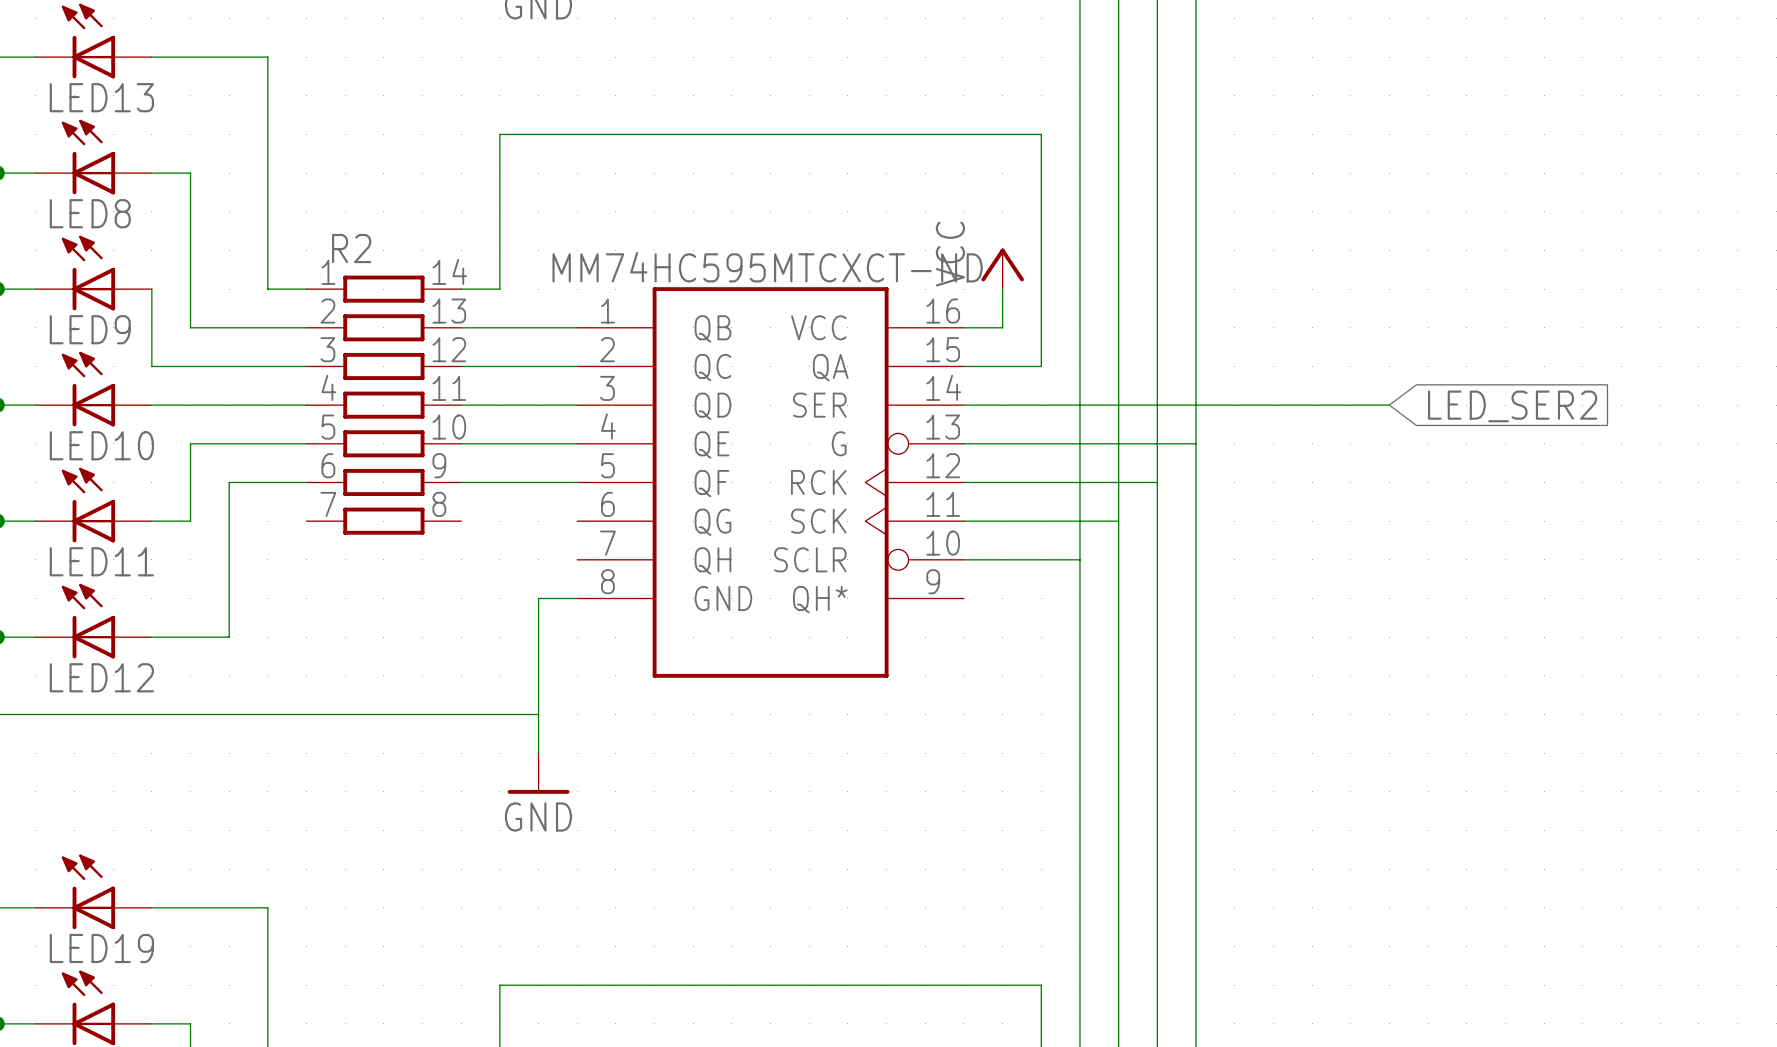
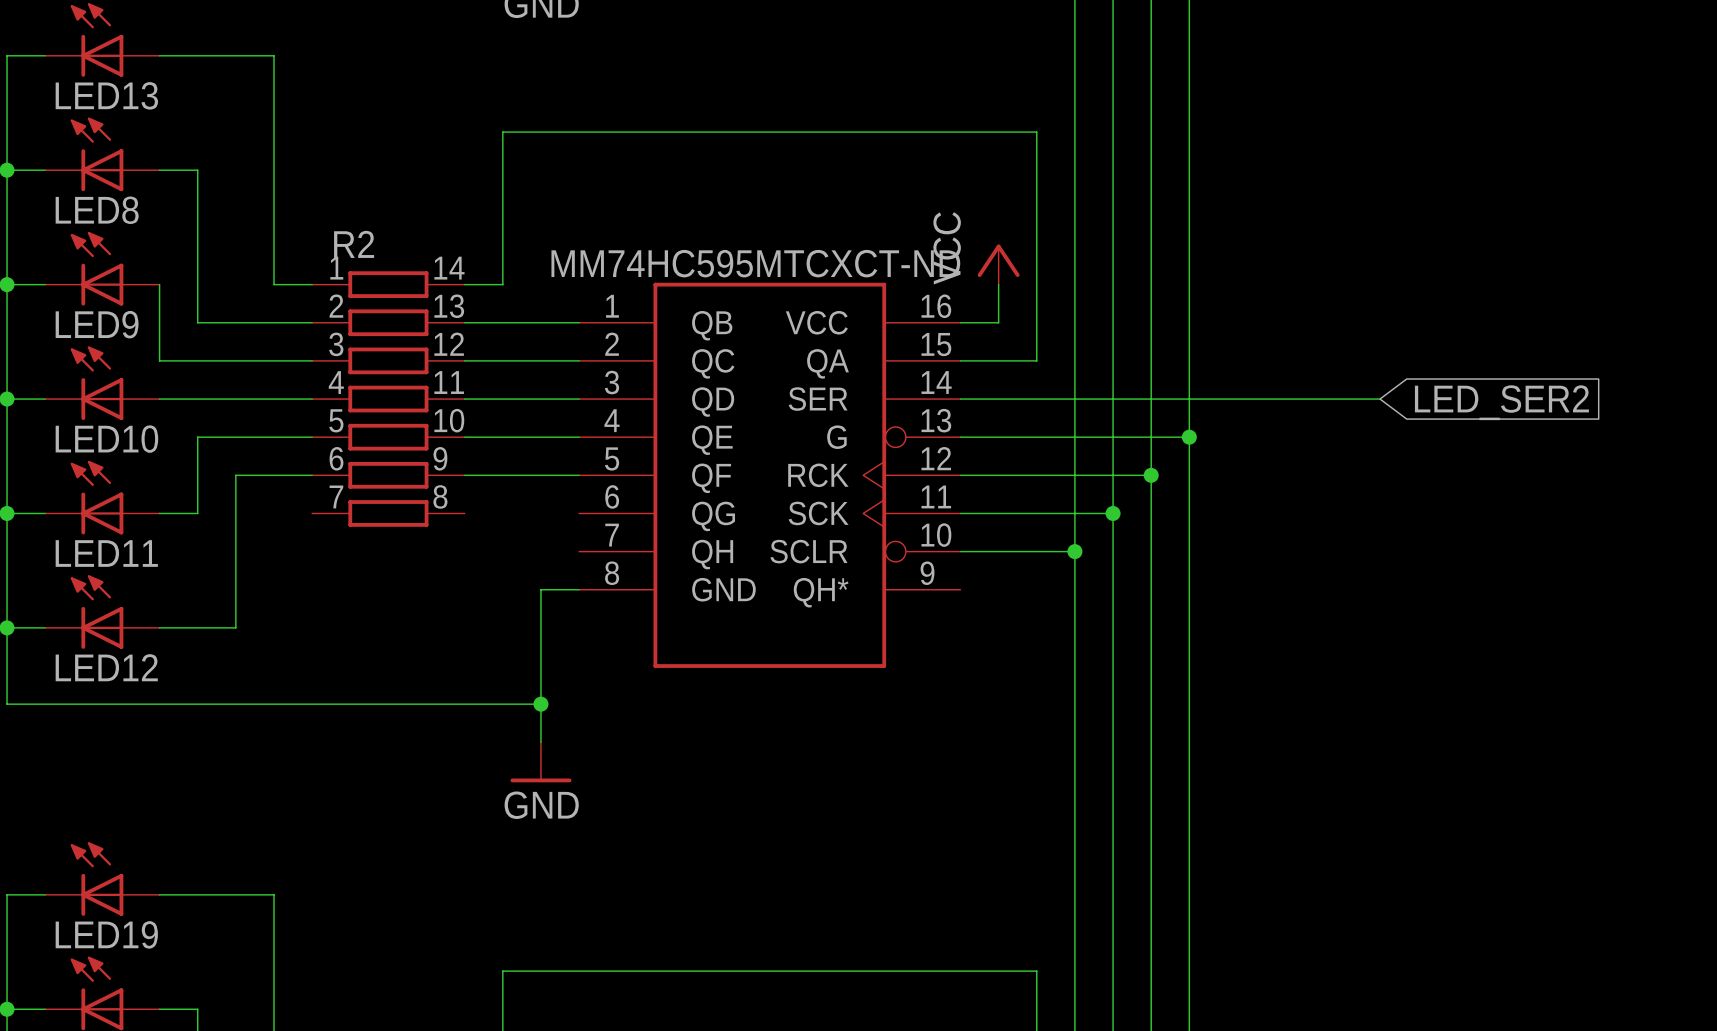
junction: none -> (1189, 437)
junction: none -> (1151, 475)
junction: none -> (1113, 513)
junction: none -> (1074, 551)
junction: none -> (540, 704)

